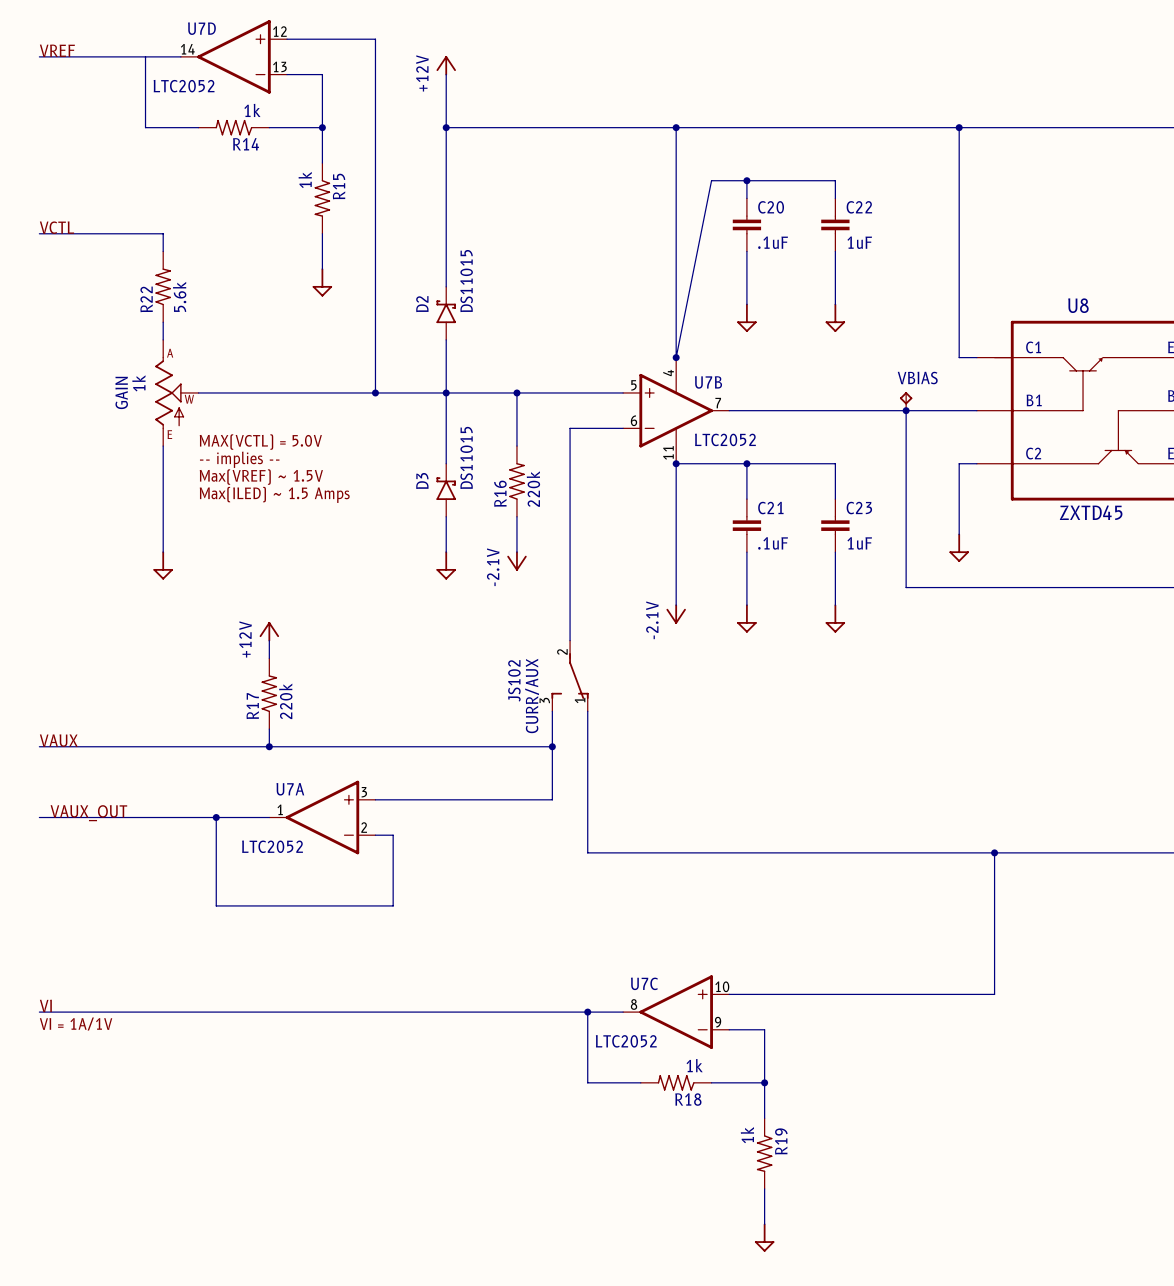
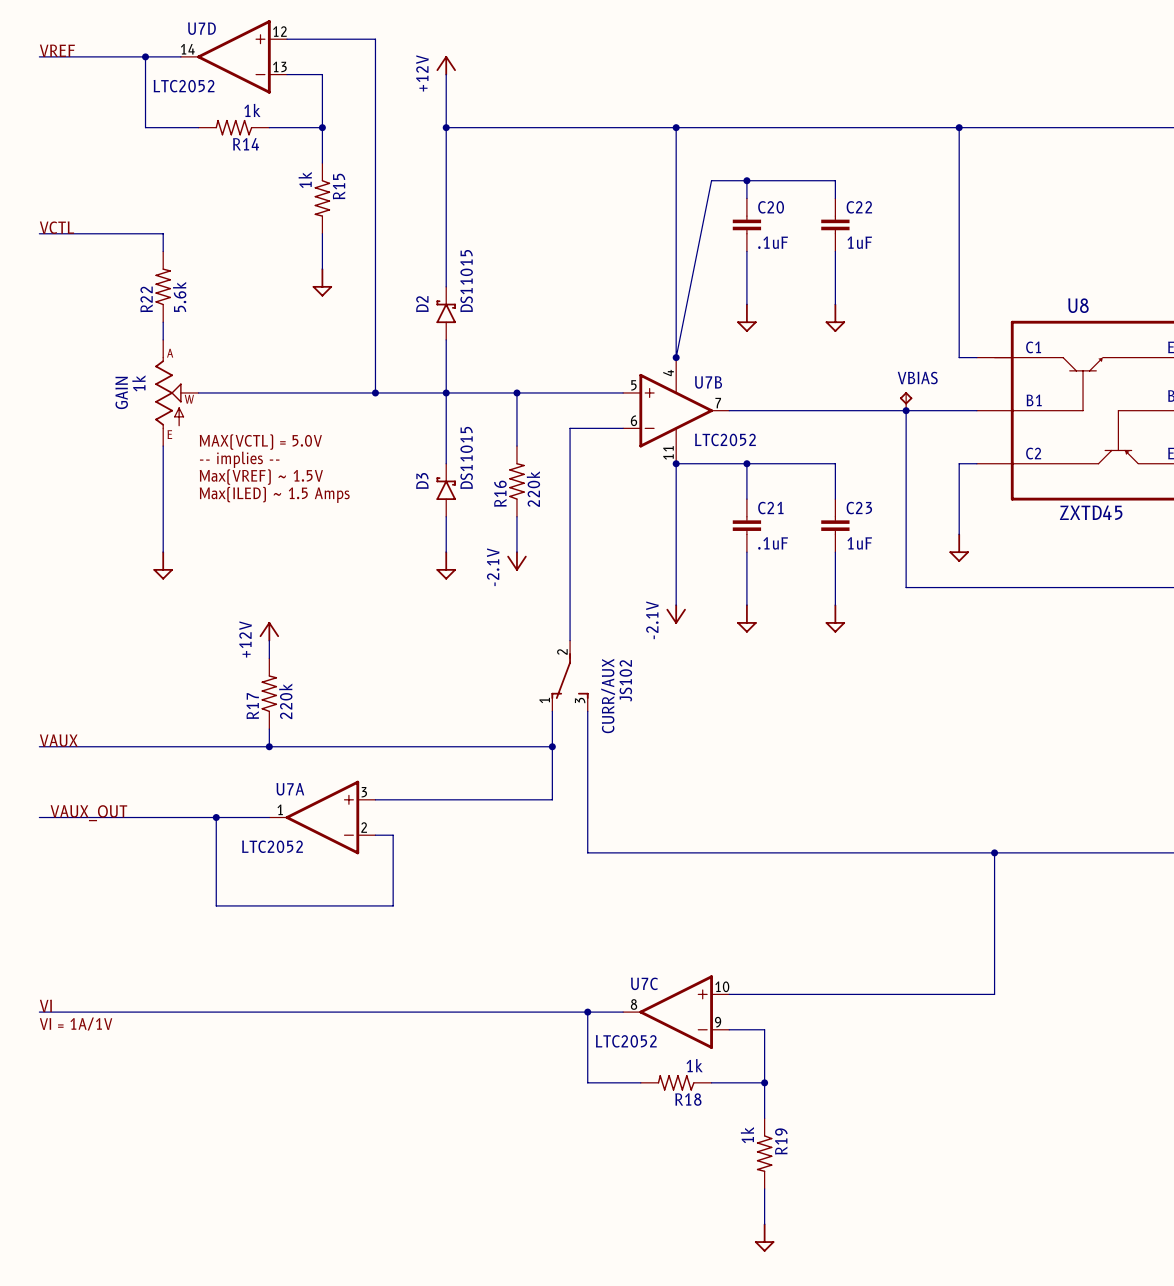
junction: none -> (145, 56)
CURR/AUX flip: as is (570, 676) -> left-right (570, 676)

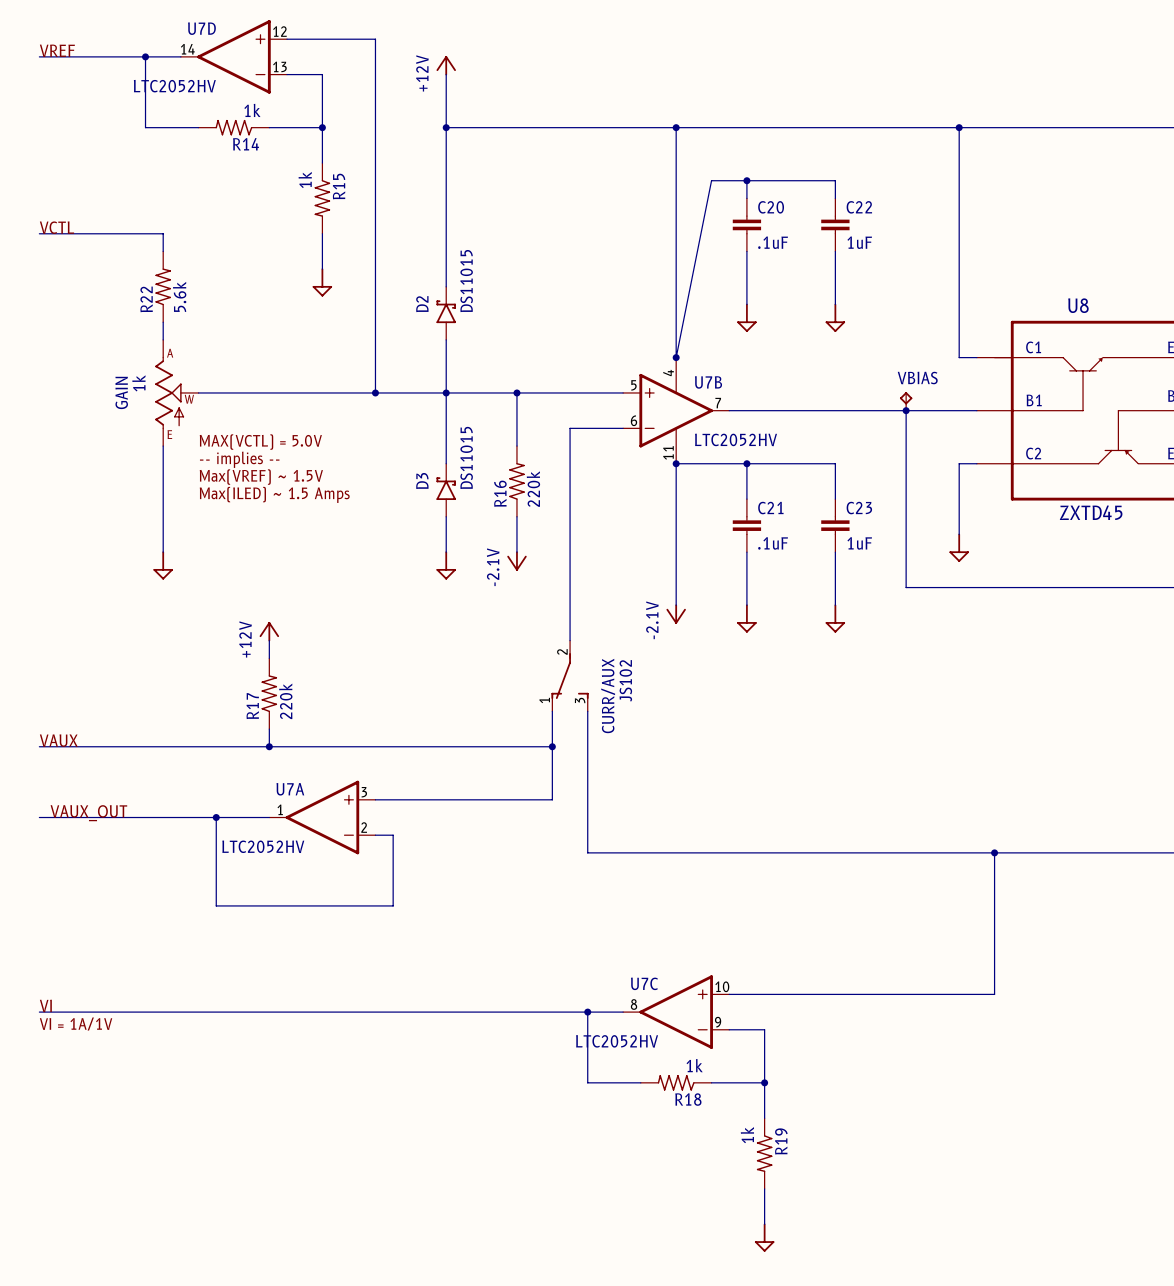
U7D value: LTC2052 (184, 86) -> LTC2052HV (174, 86)
U7B value: LTC2052 (725, 439) -> LTC2052HV (736, 439)
U7A value: LTC2052 (272, 846) -> LTC2052HV (263, 846)
U7C value: LTC2052 (626, 1041) -> LTC2052HV (617, 1041)

